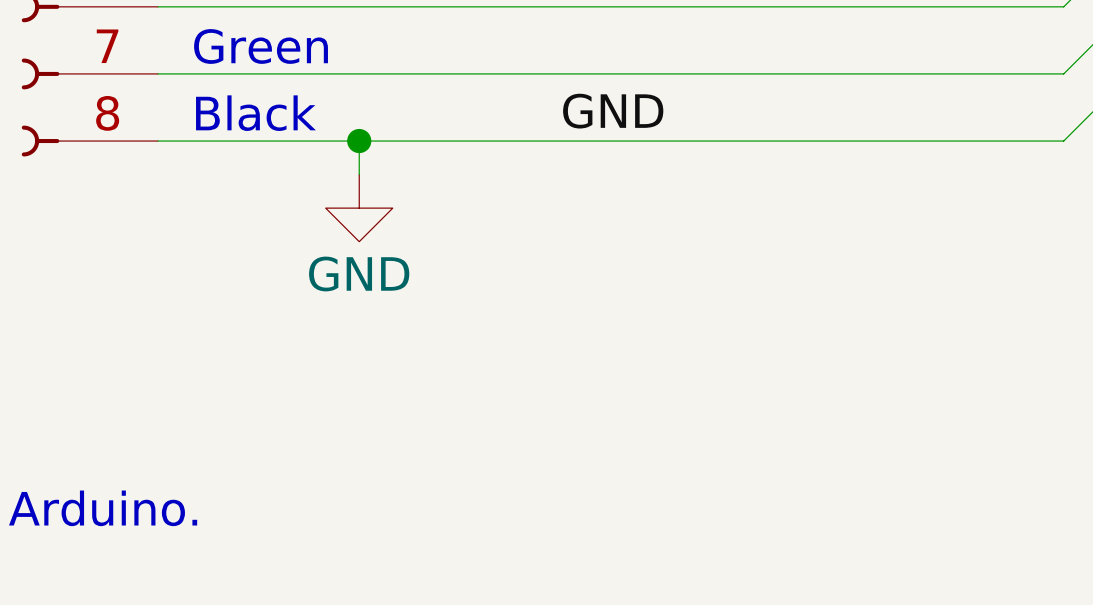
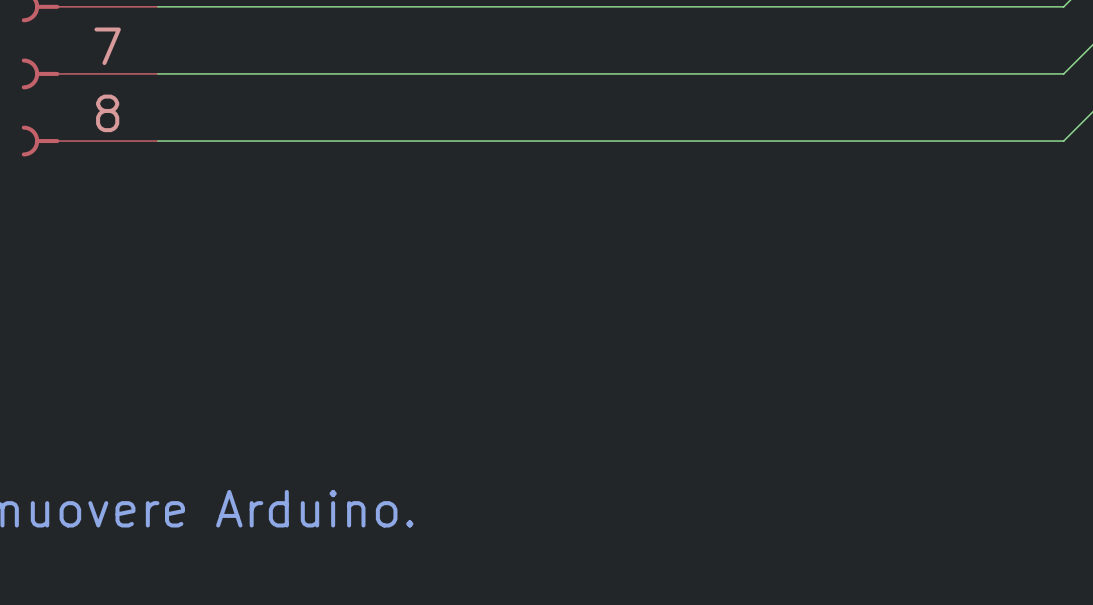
text: Green (261, 46) -> none
label: GND (613, 111) -> none
text: Black (255, 113) -> none
wire: (359, 141) (359, 174) -> none
junction: (359, 141) -> none
power symbol: GND (359, 208) -> none

